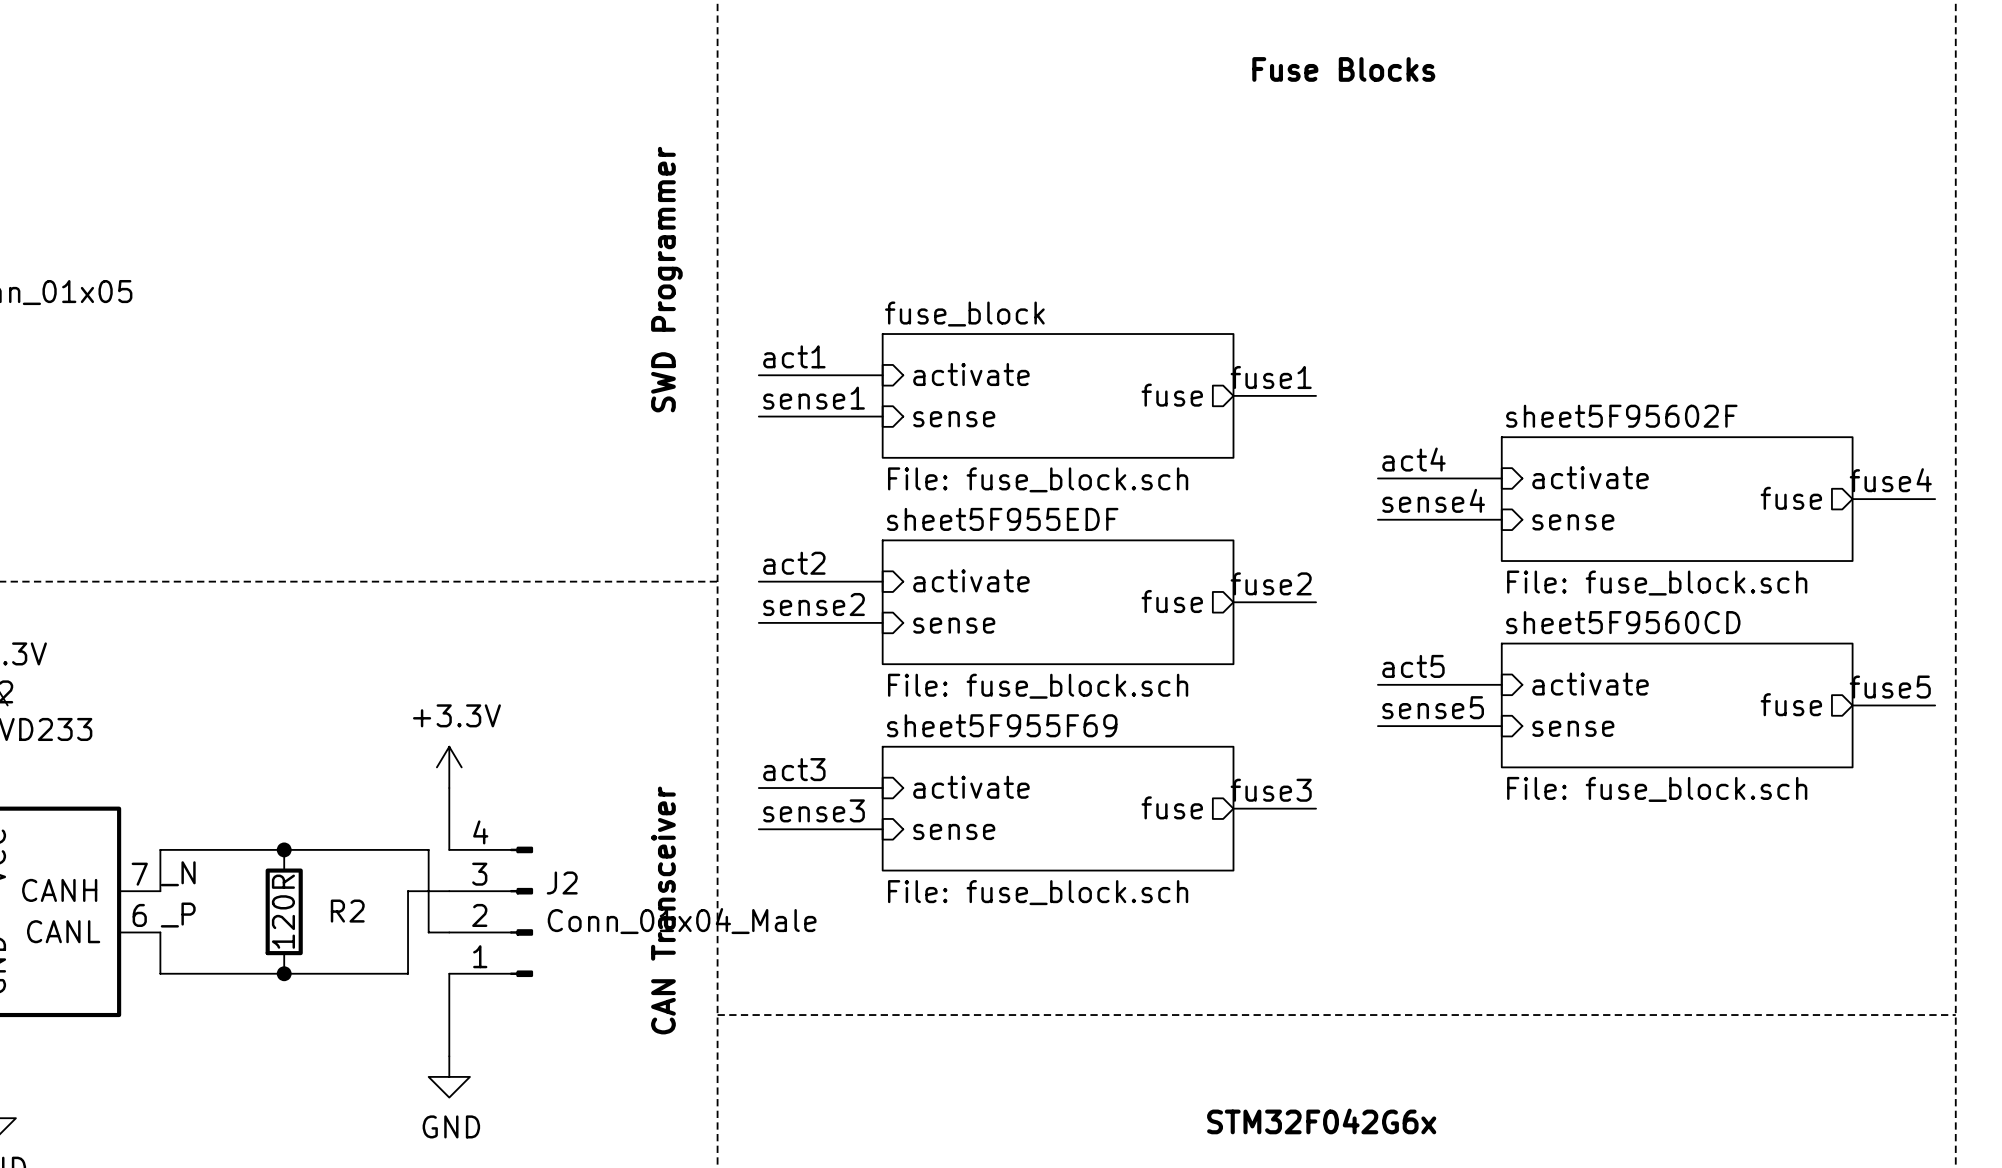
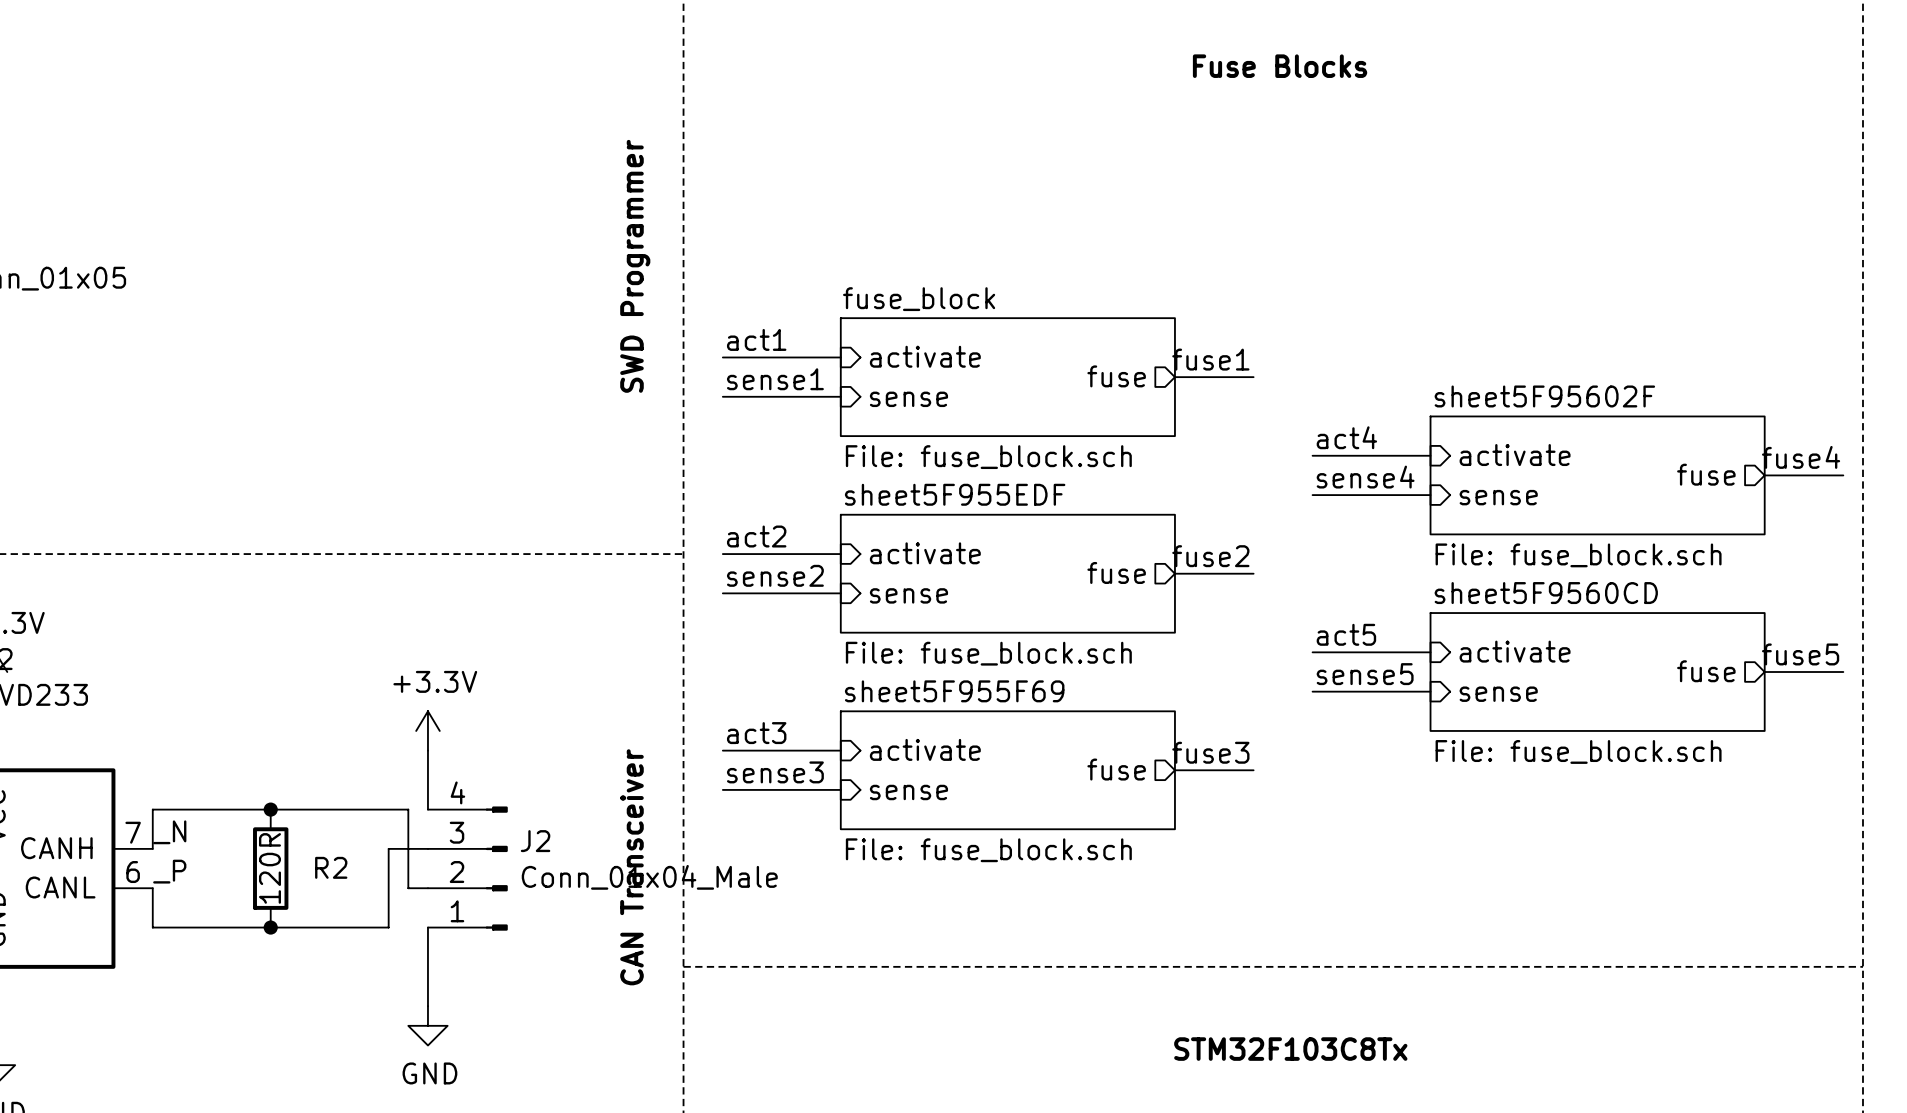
text: STM32F042G6x (1321, 1121) -> STM32F103C8Tx (1290, 1049)

